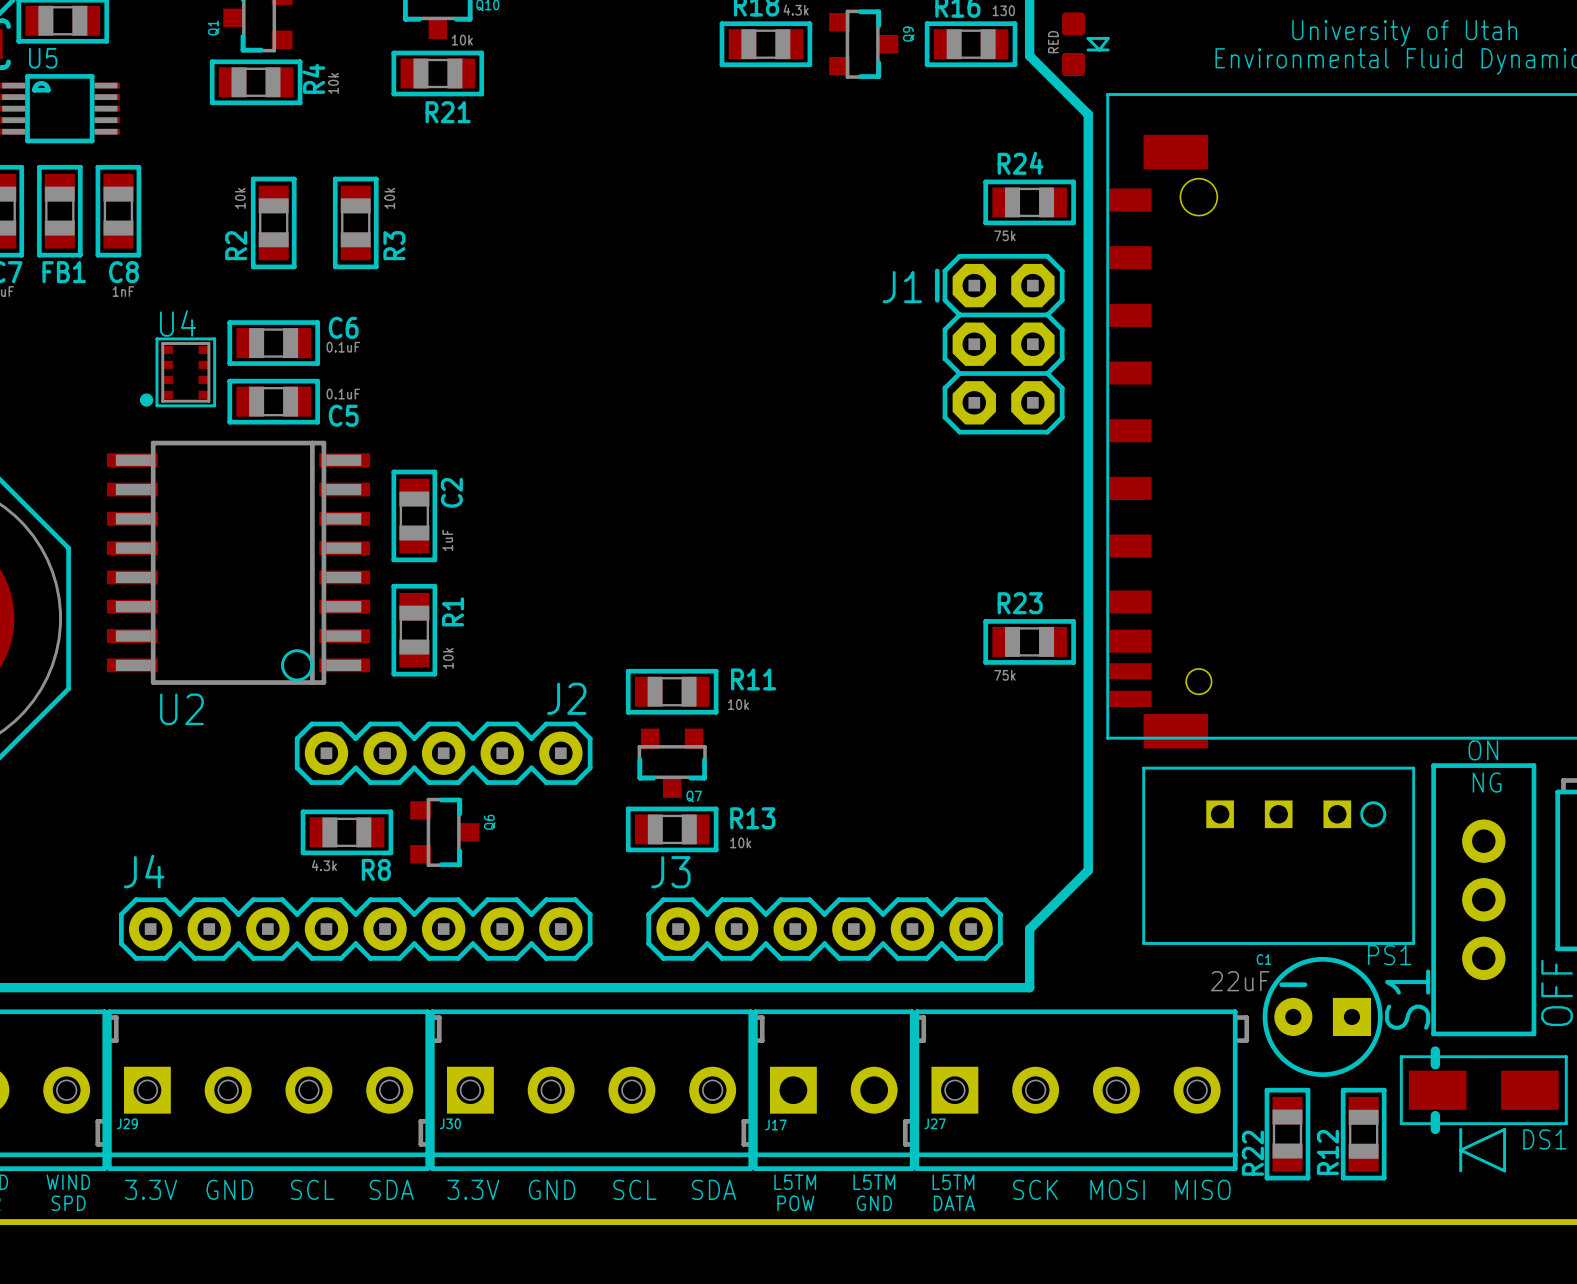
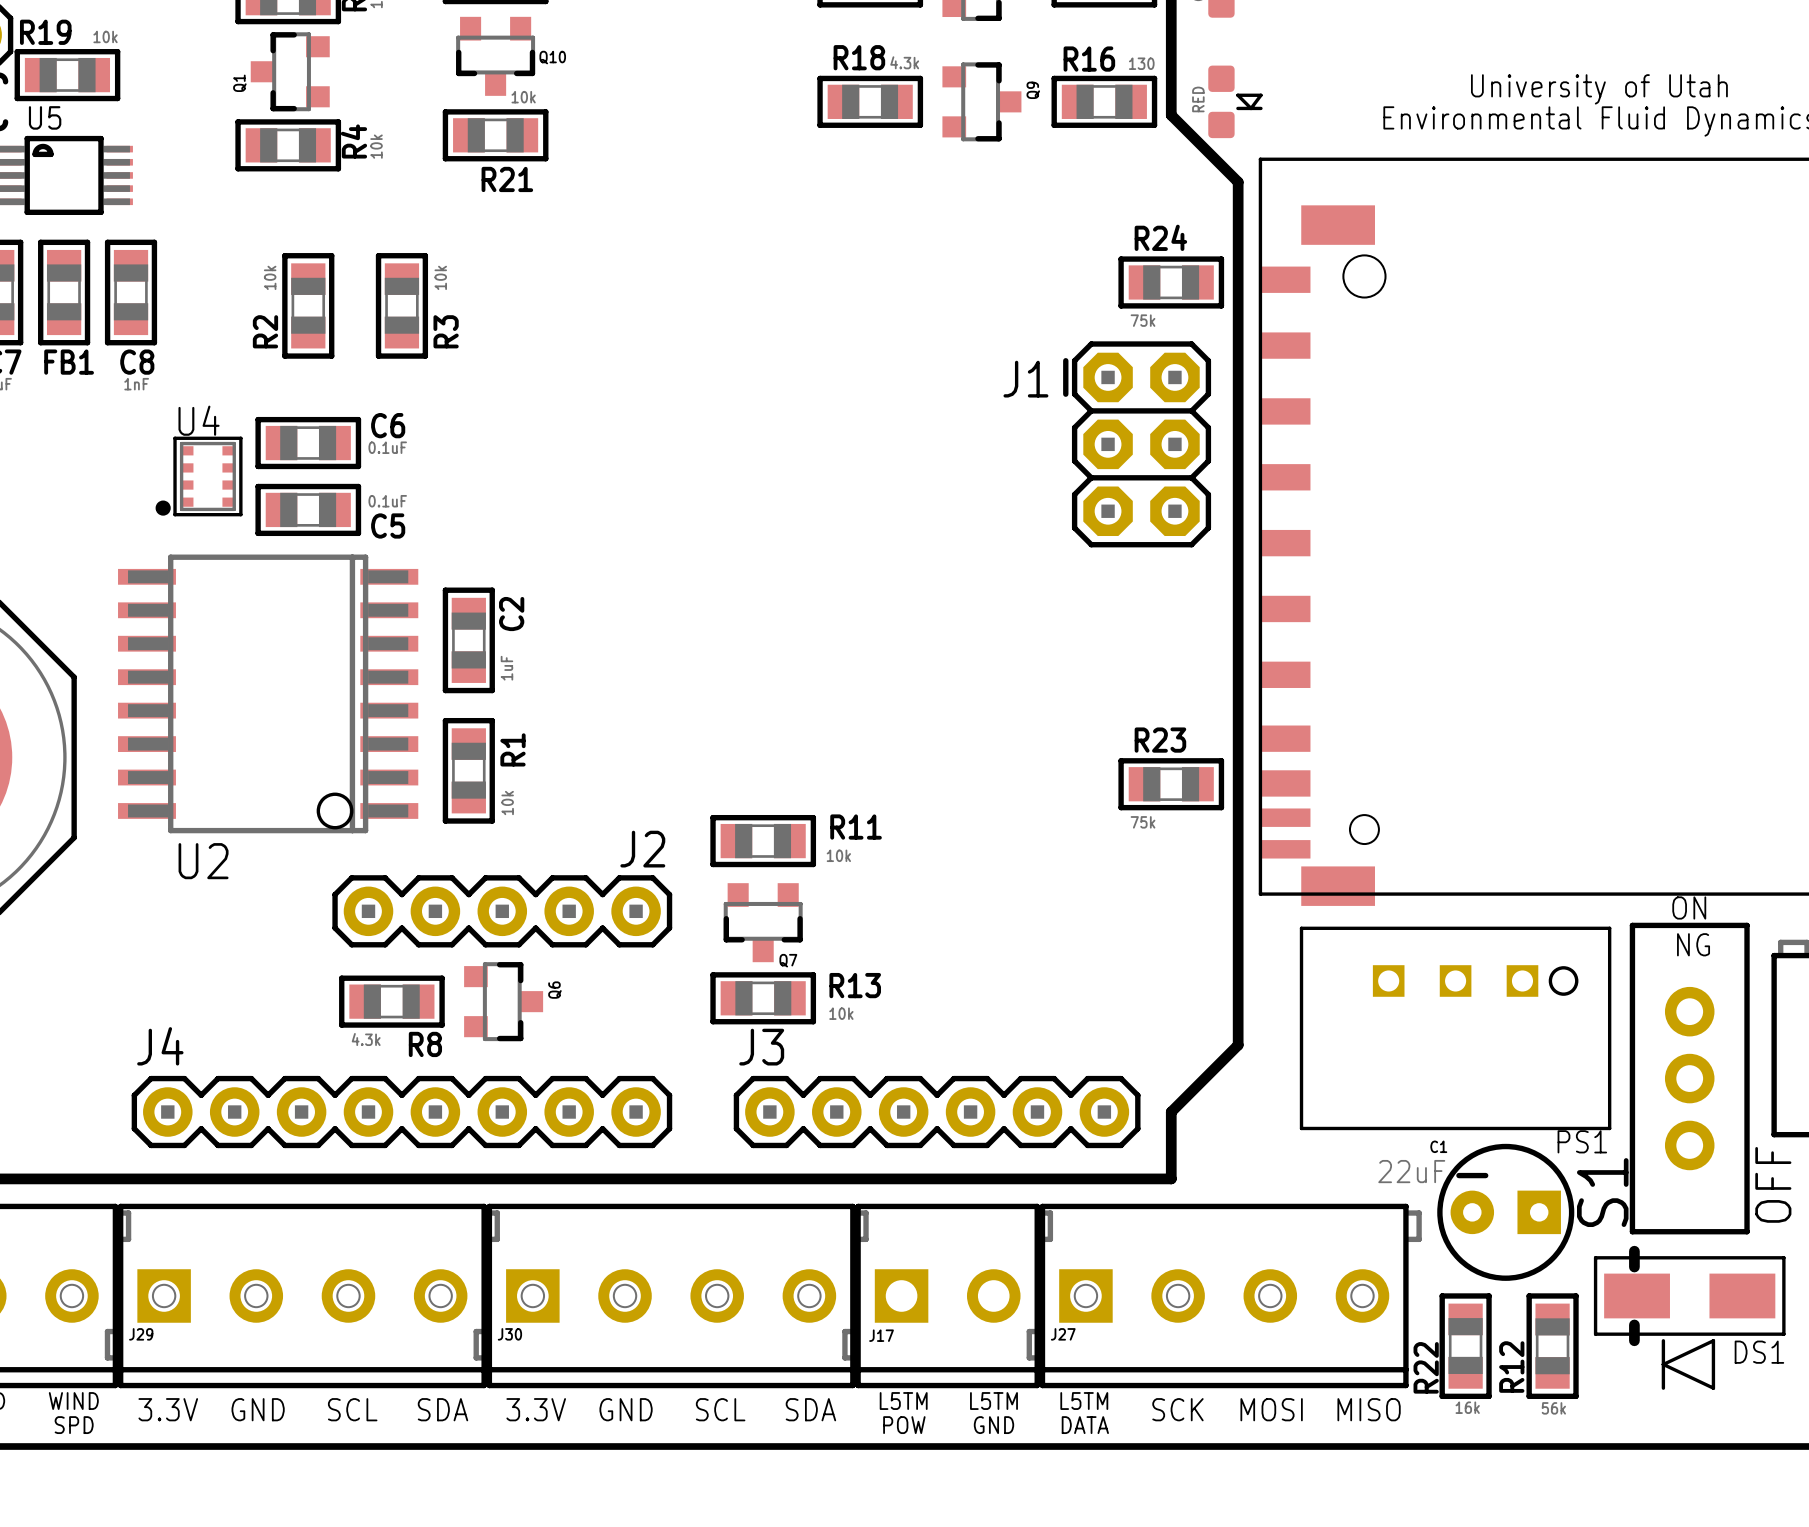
R22 value: none -> 16k (1467, 1407)
R12 value: none -> 56k (1553, 1408)

